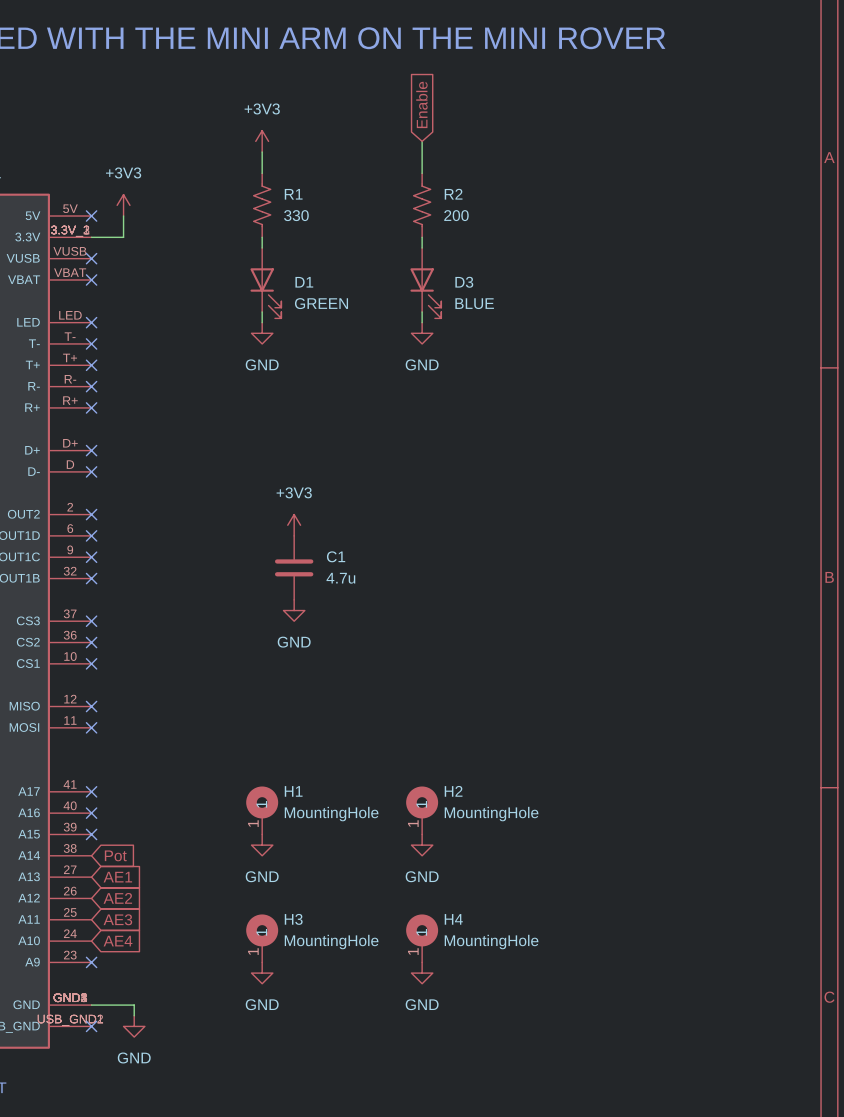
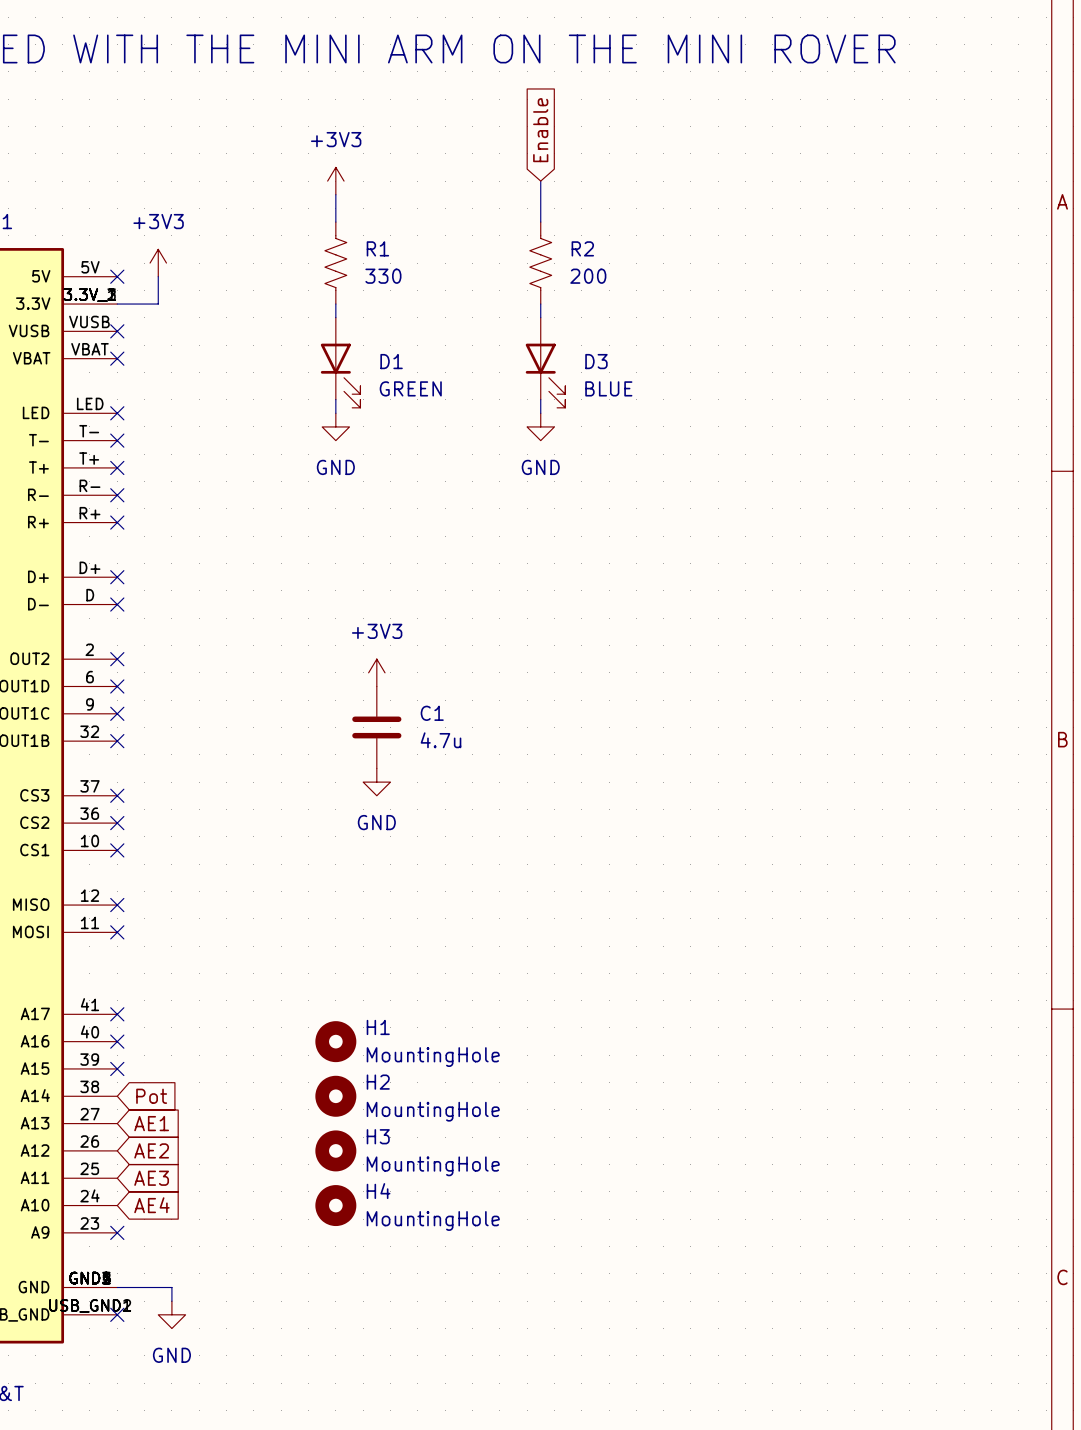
H1 symbol: [246, 786, 279, 835] -> [315, 1021, 357, 1063]
H2 symbol: [406, 786, 439, 835] -> [315, 1075, 357, 1117]
power symbol: GND (262, 845) -> none
power symbol: GND (422, 845) -> none
H3 symbol: [246, 914, 279, 963] -> [315, 1130, 357, 1172]
H4 symbol: [406, 914, 439, 963] -> [315, 1185, 357, 1227]
power symbol: GND (262, 973) -> none
power symbol: GND (422, 973) -> none

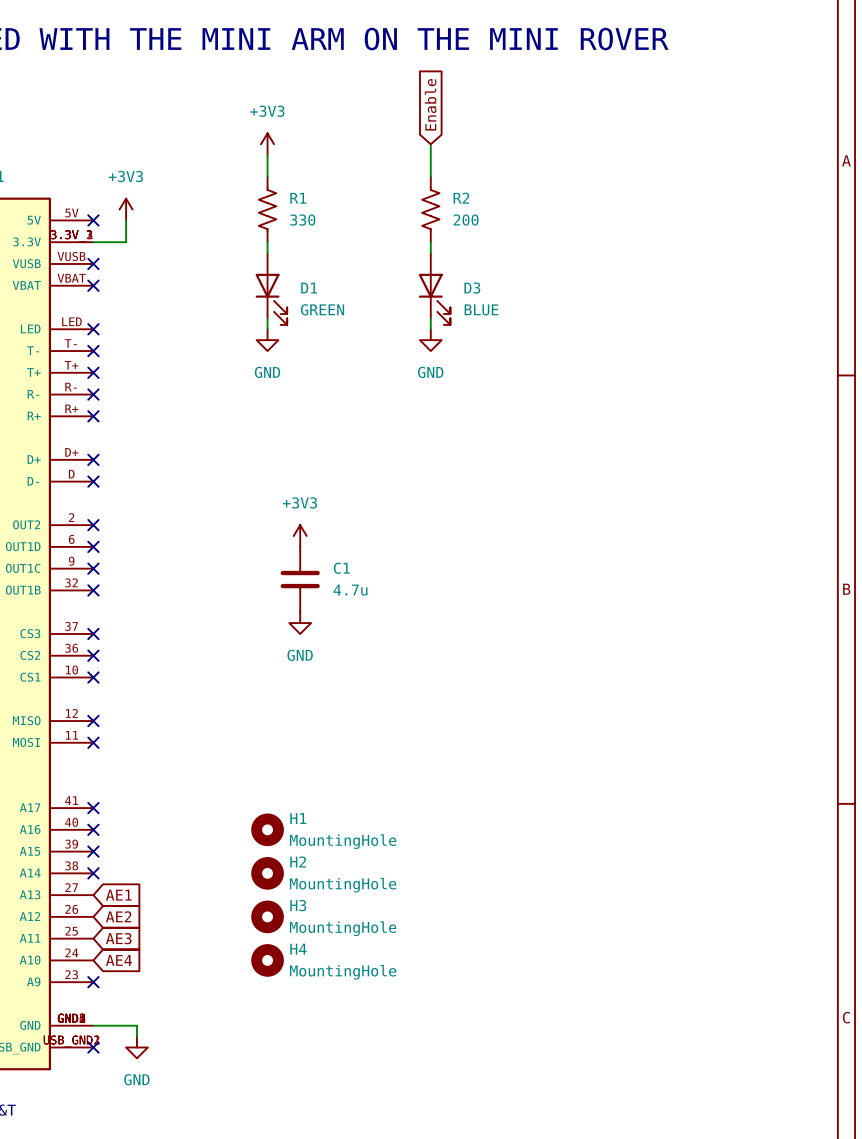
no-connect mark: none -> (93, 873)
global label: Pot (151, 1096) -> none

